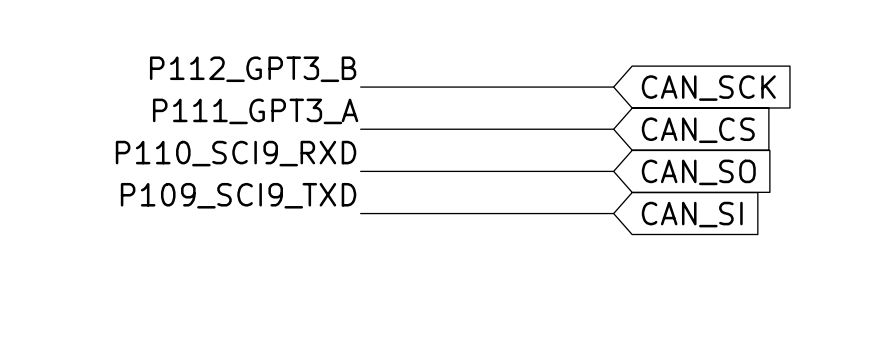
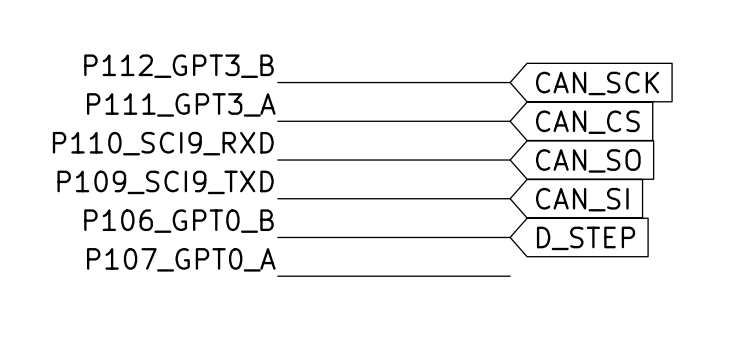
label: none -> P106_GPT0_B (178, 221)
wire: none -> (277, 237) (510, 237)
global label: none -> D_STEP (586, 238)
label: none -> P107_GPT0_A (181, 259)
wire: none -> (277, 276) (510, 276)

